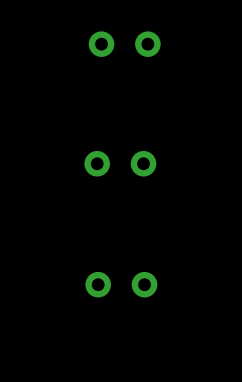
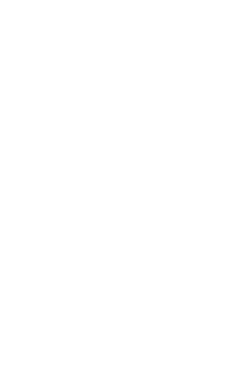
part: (124, 44) -> none
part: (120, 163) -> none
part: (121, 284) -> none

